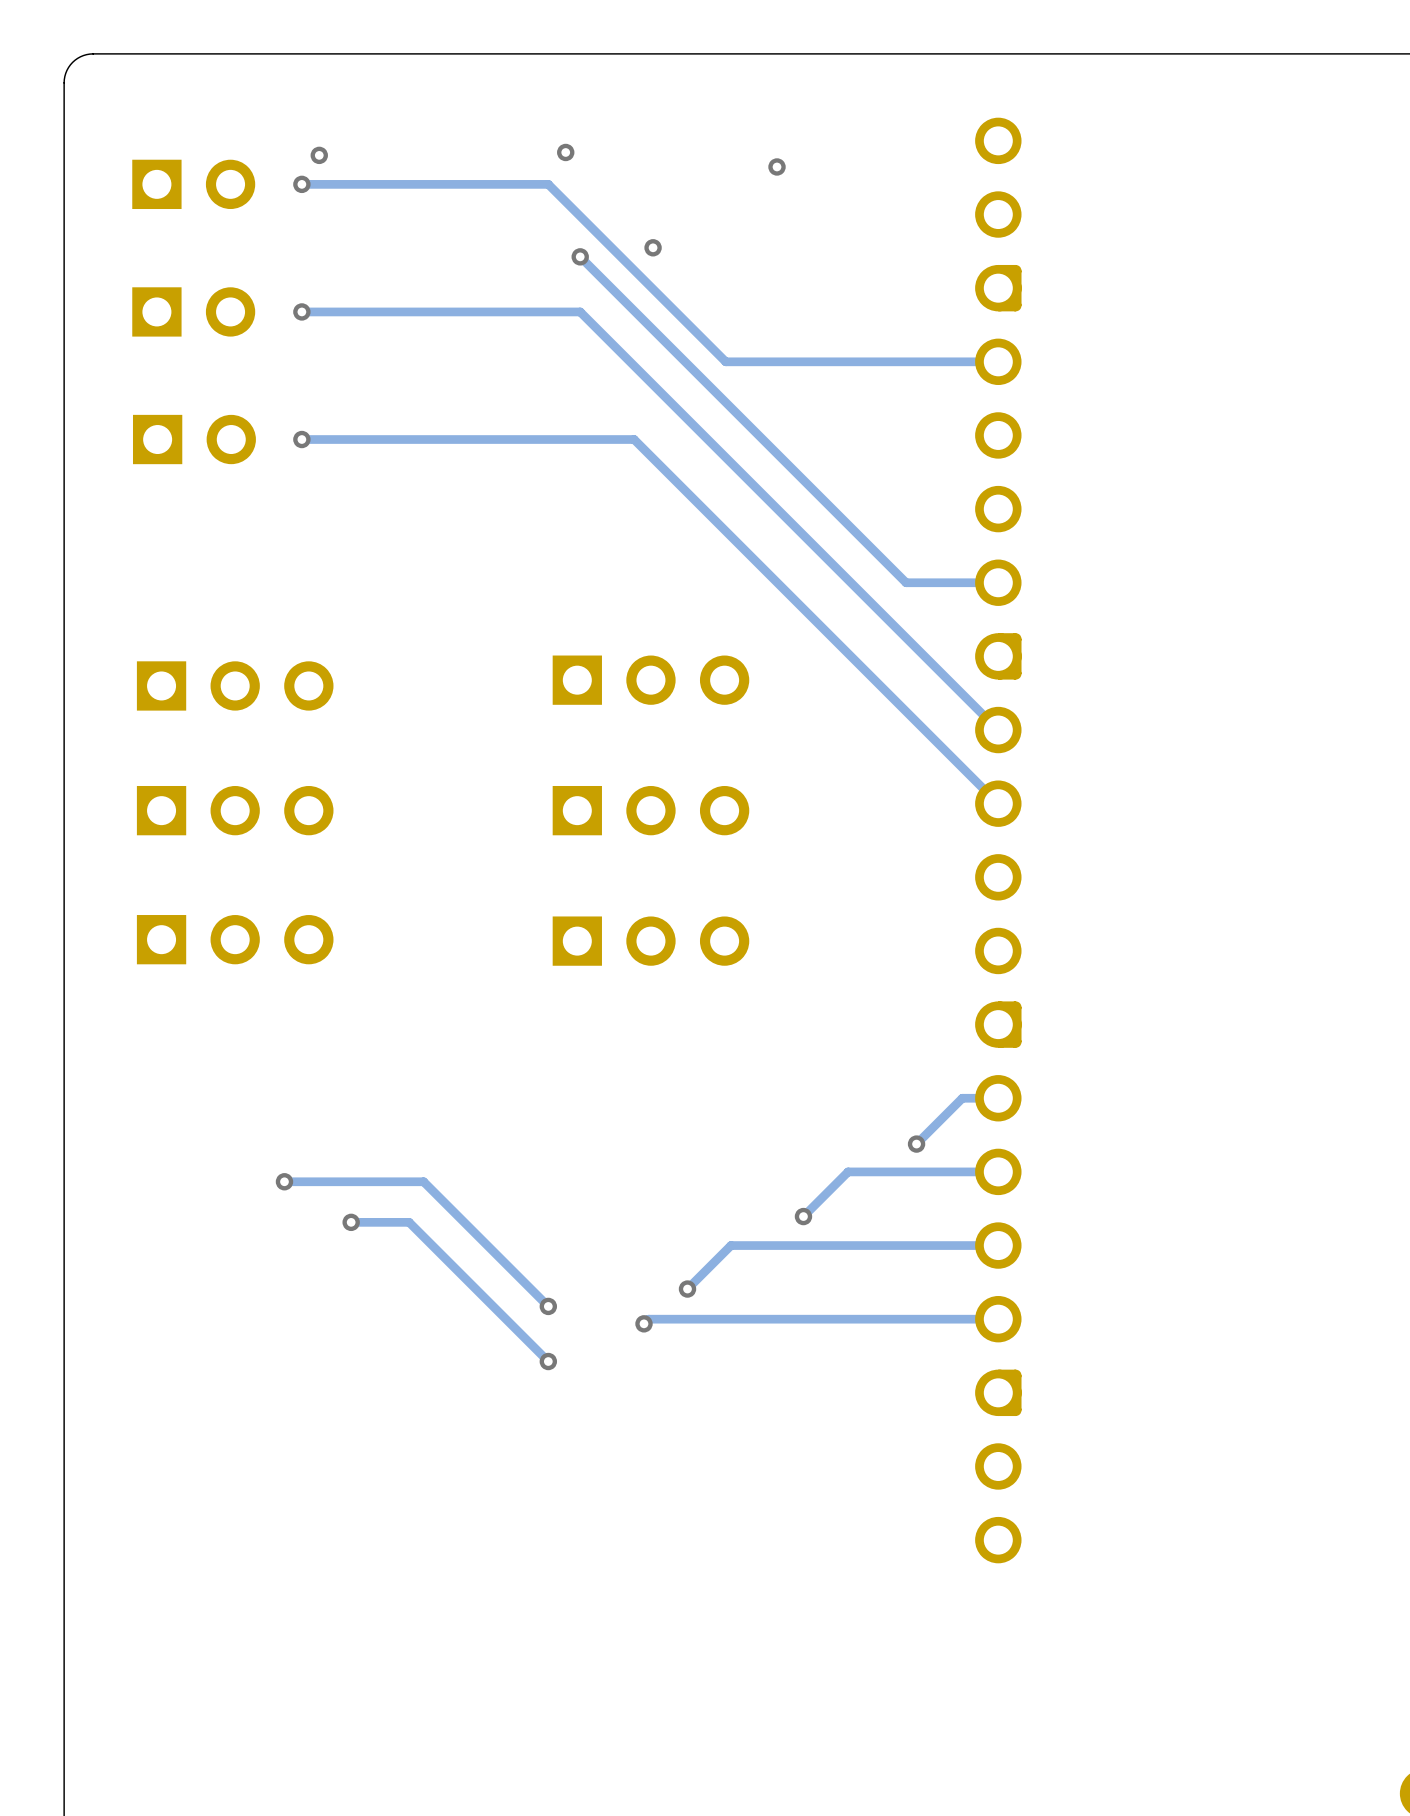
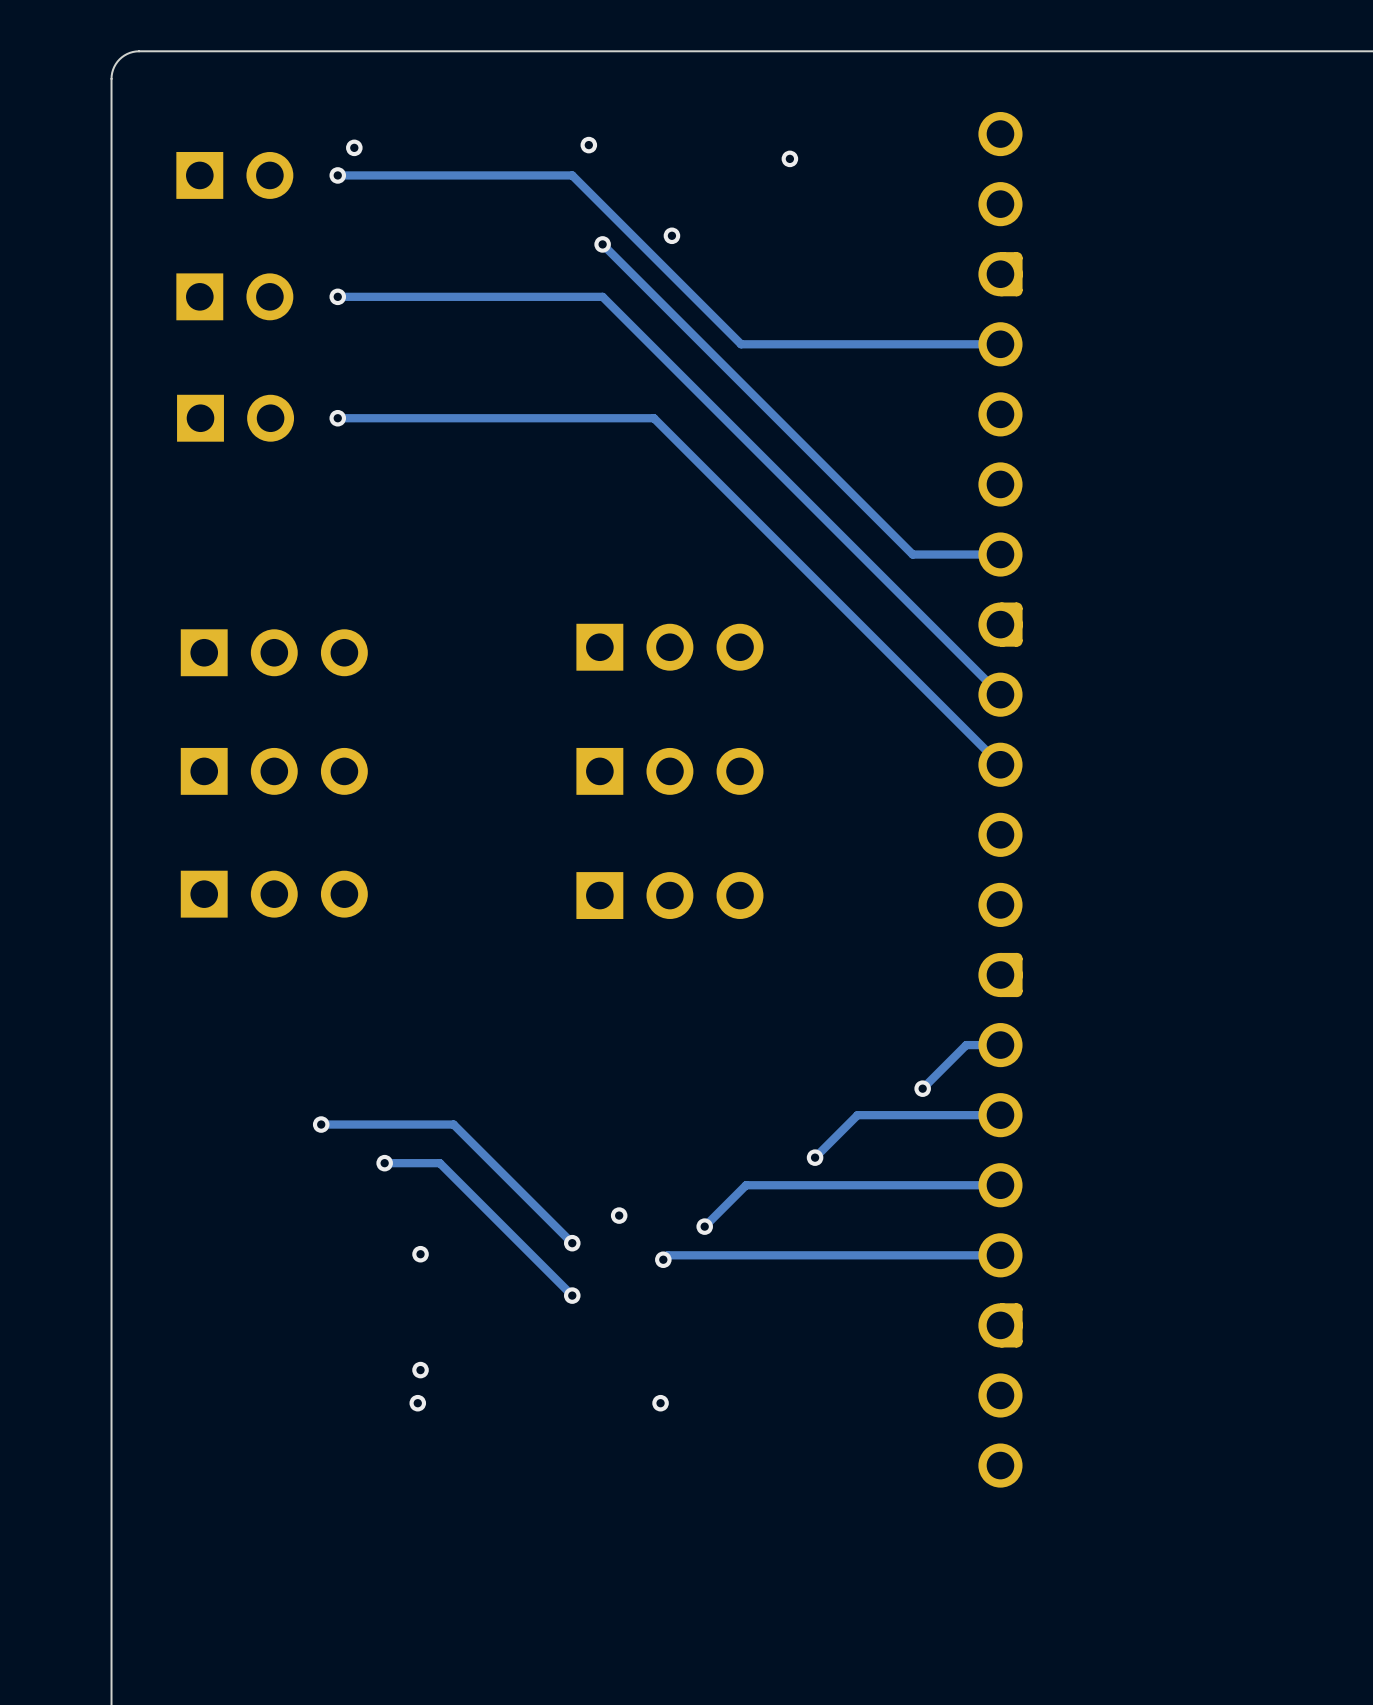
via: none -> (619, 1215)
via: none -> (420, 1254)
via: none -> (420, 1370)
via: none -> (417, 1403)
via: none -> (660, 1403)

